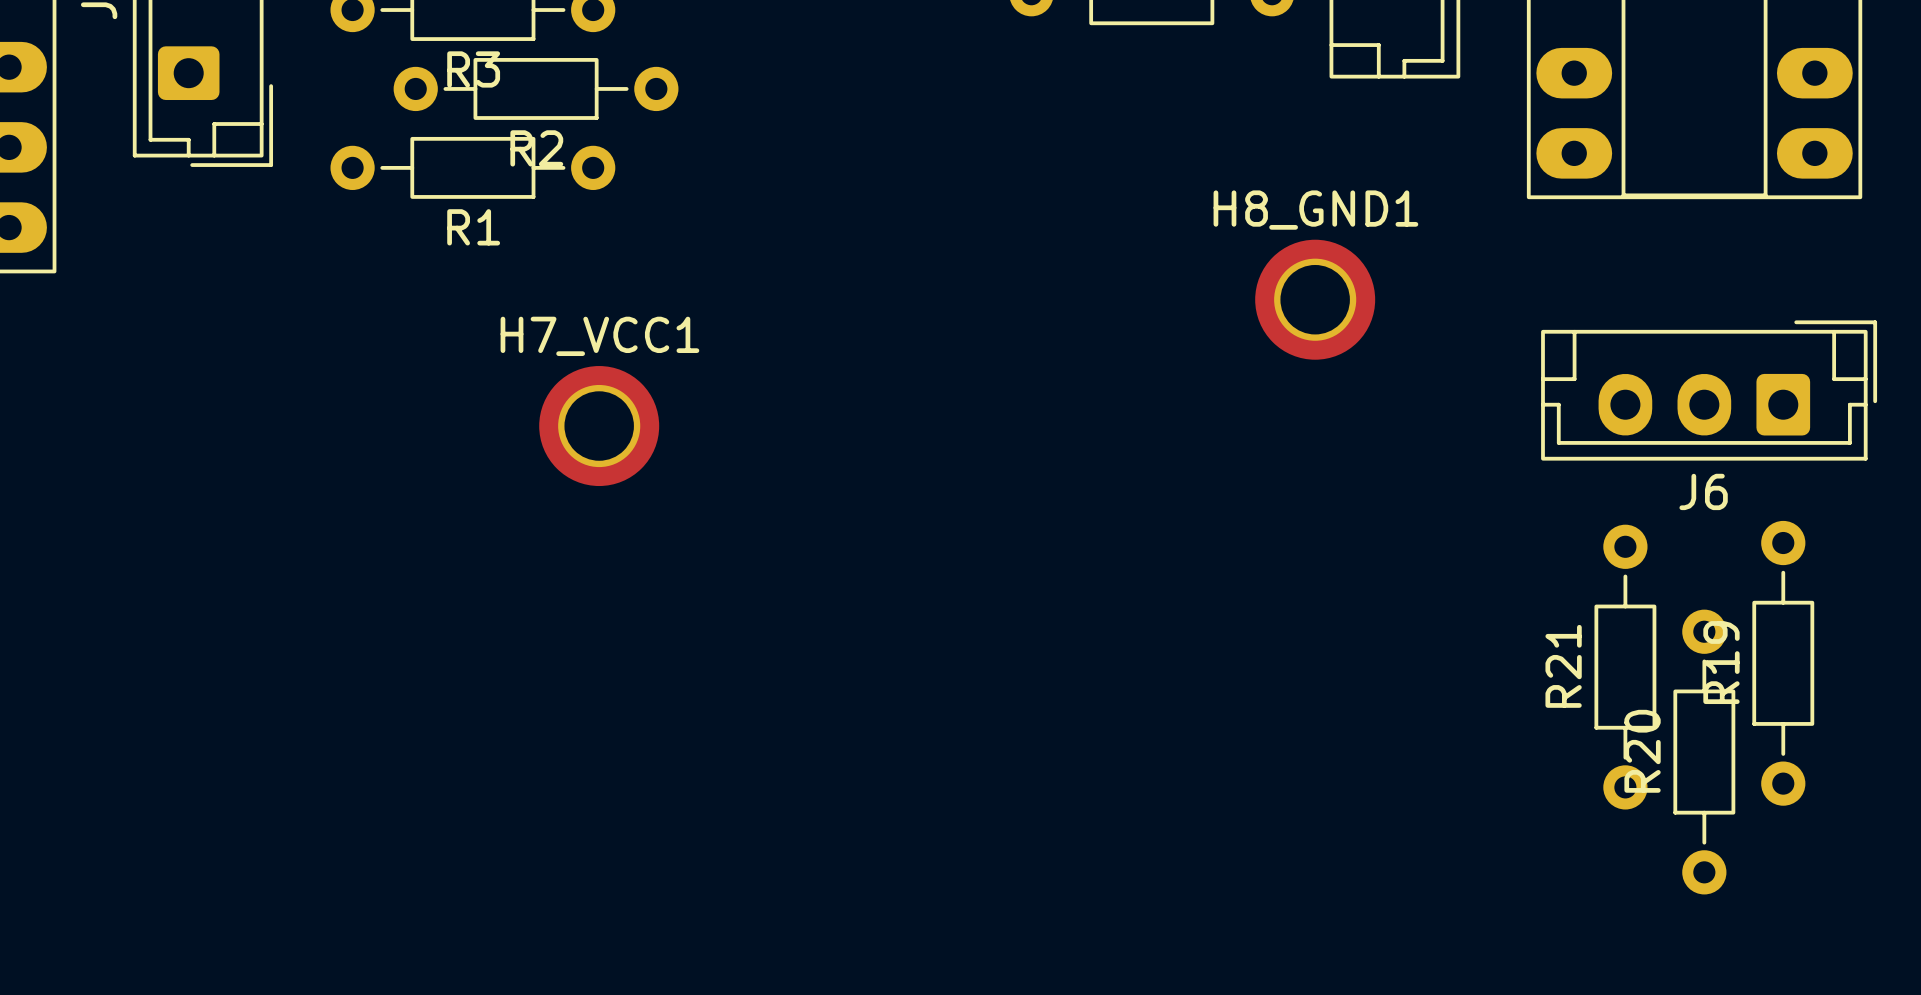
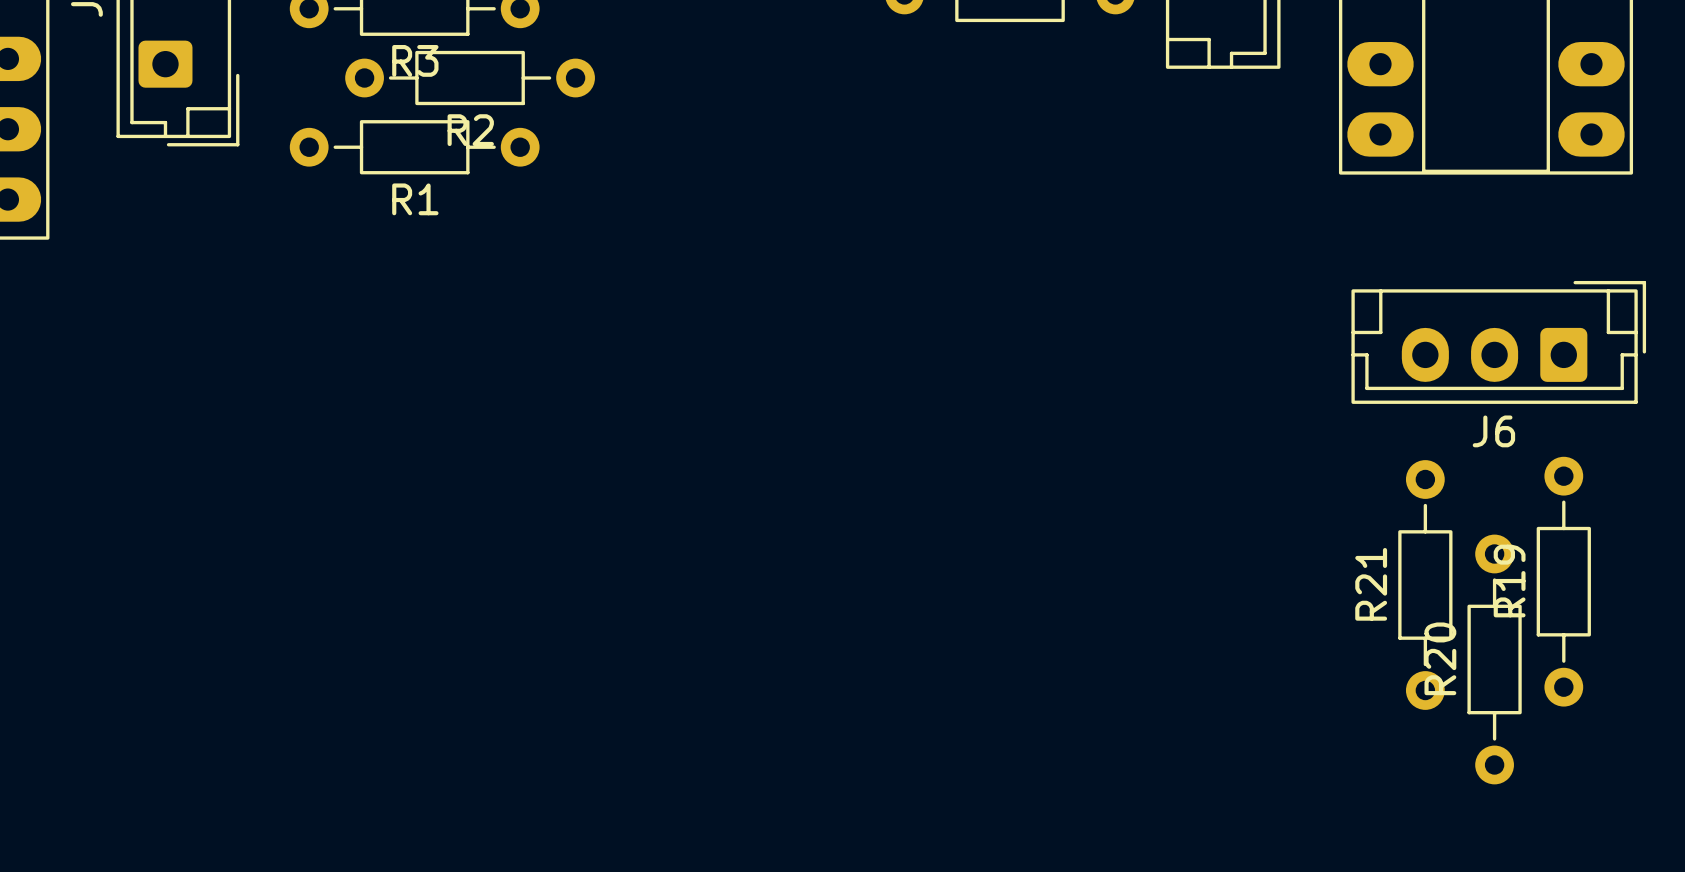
H8_GND1: (1315, 299) -> none
H7_VCC1: (599, 426) -> none

